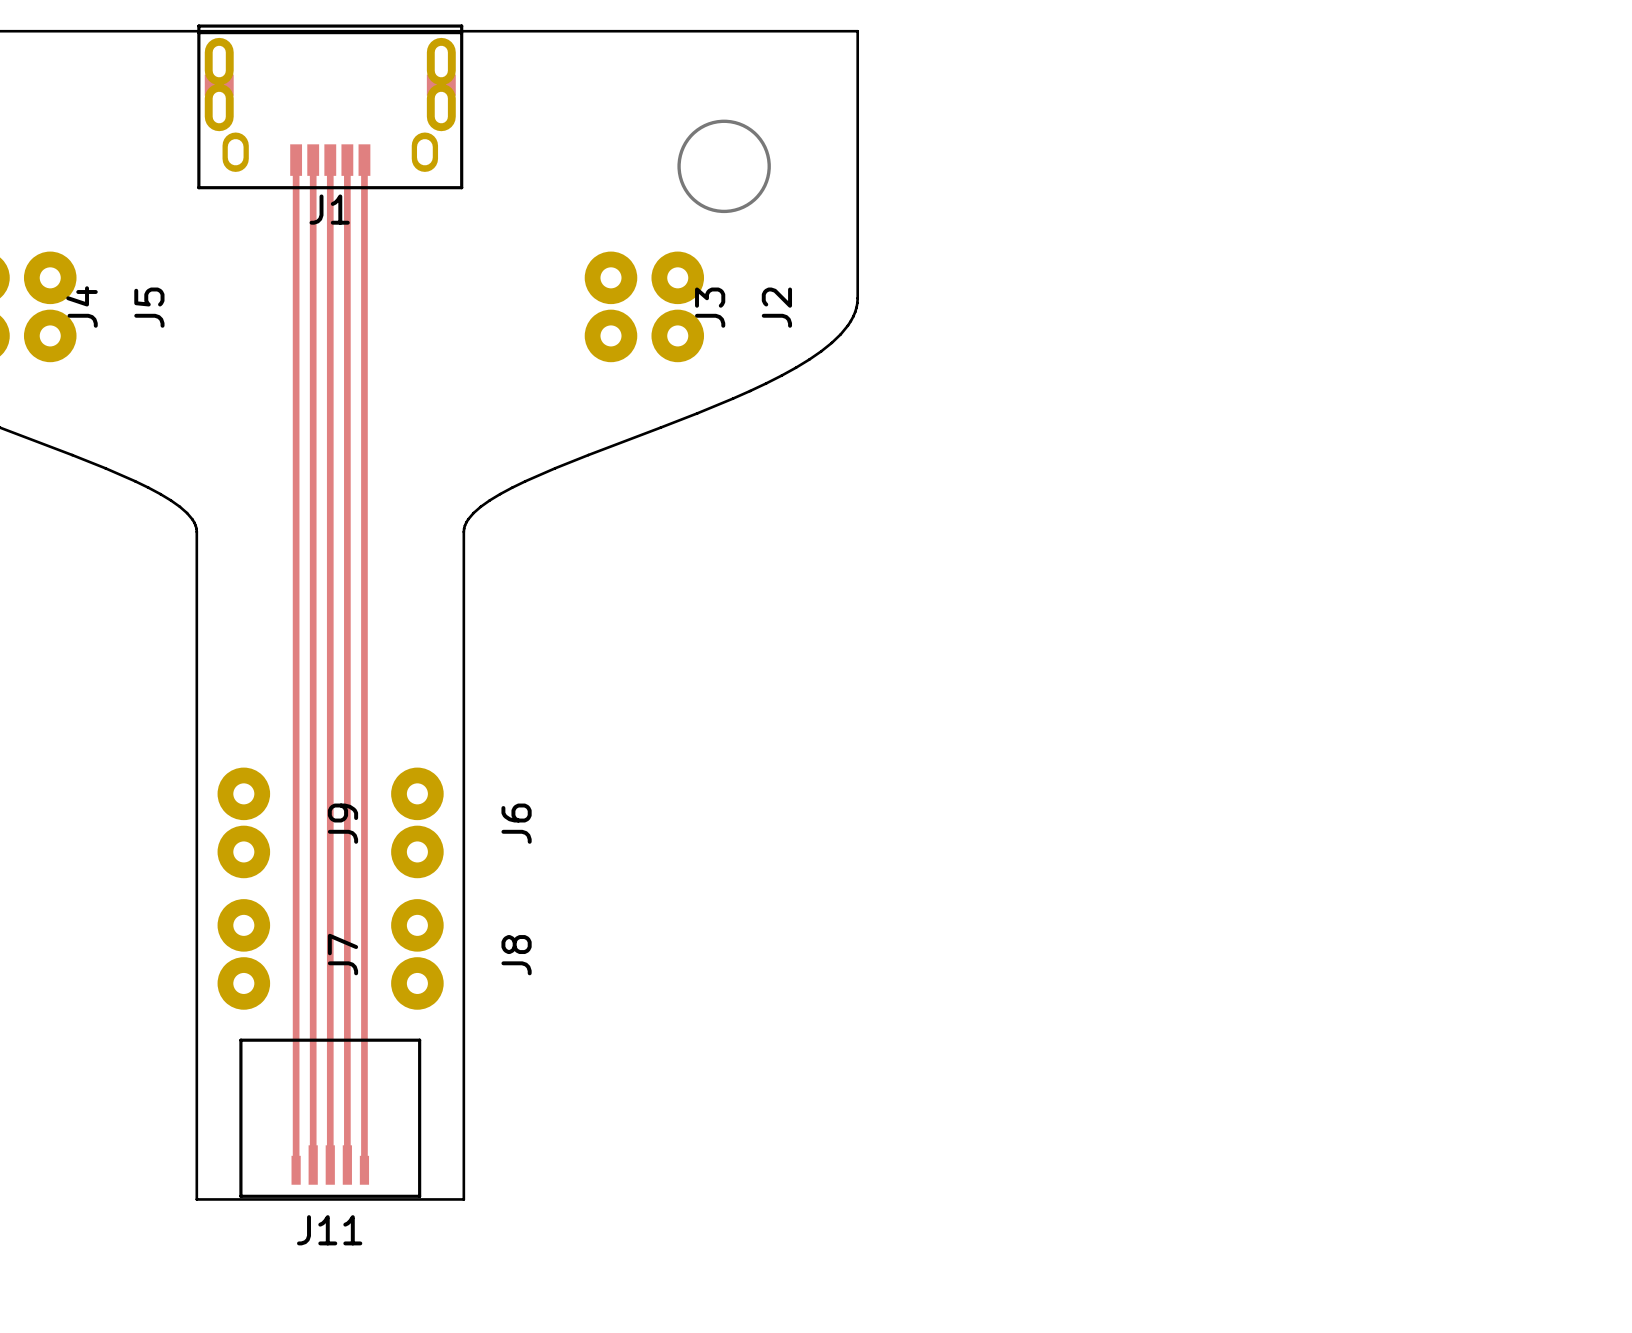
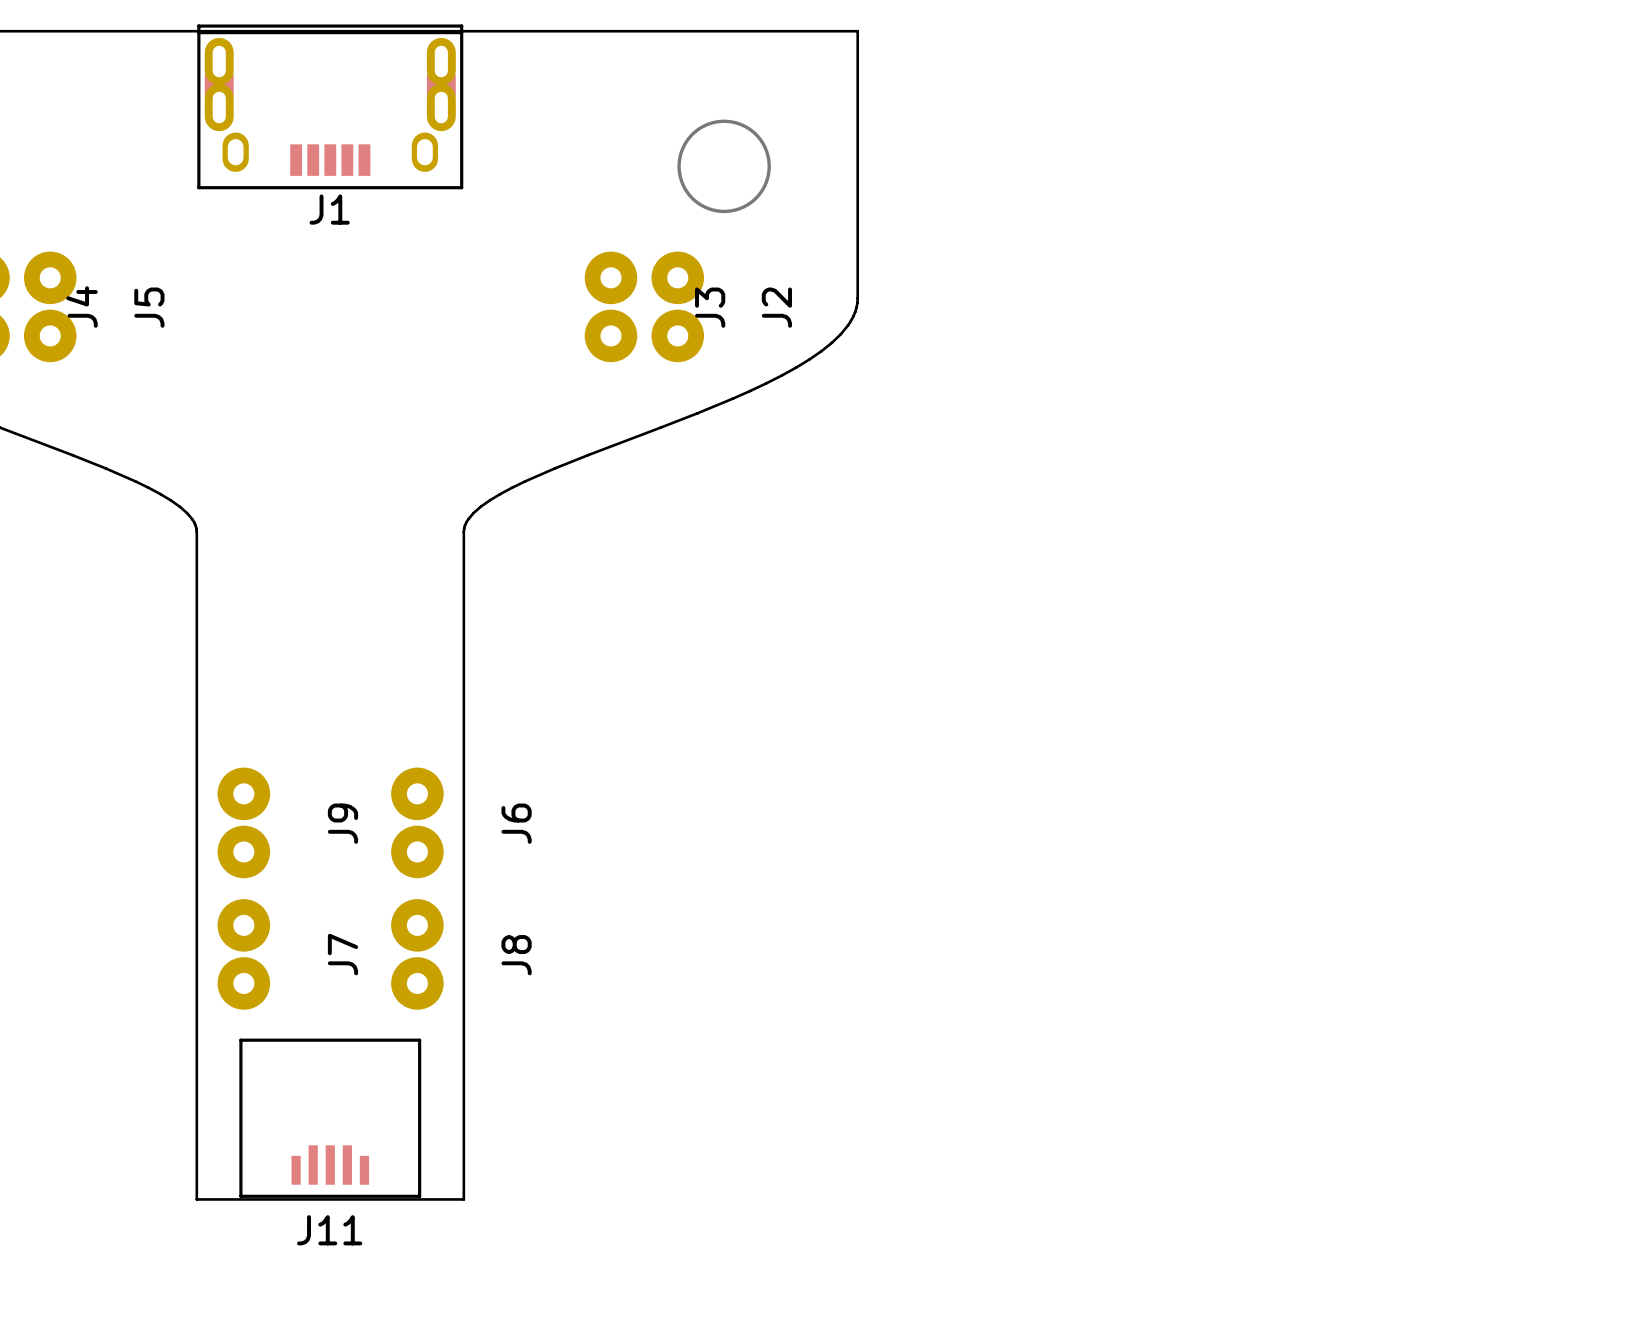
top track: (296, 160) (296, 1170) -> none
top track: (313, 160) (313, 1165) -> none
top track: (330, 160) (330, 1165) -> none
top track: (347, 160) (347, 1165) -> none
top track: (364, 160) (364, 1170) -> none

